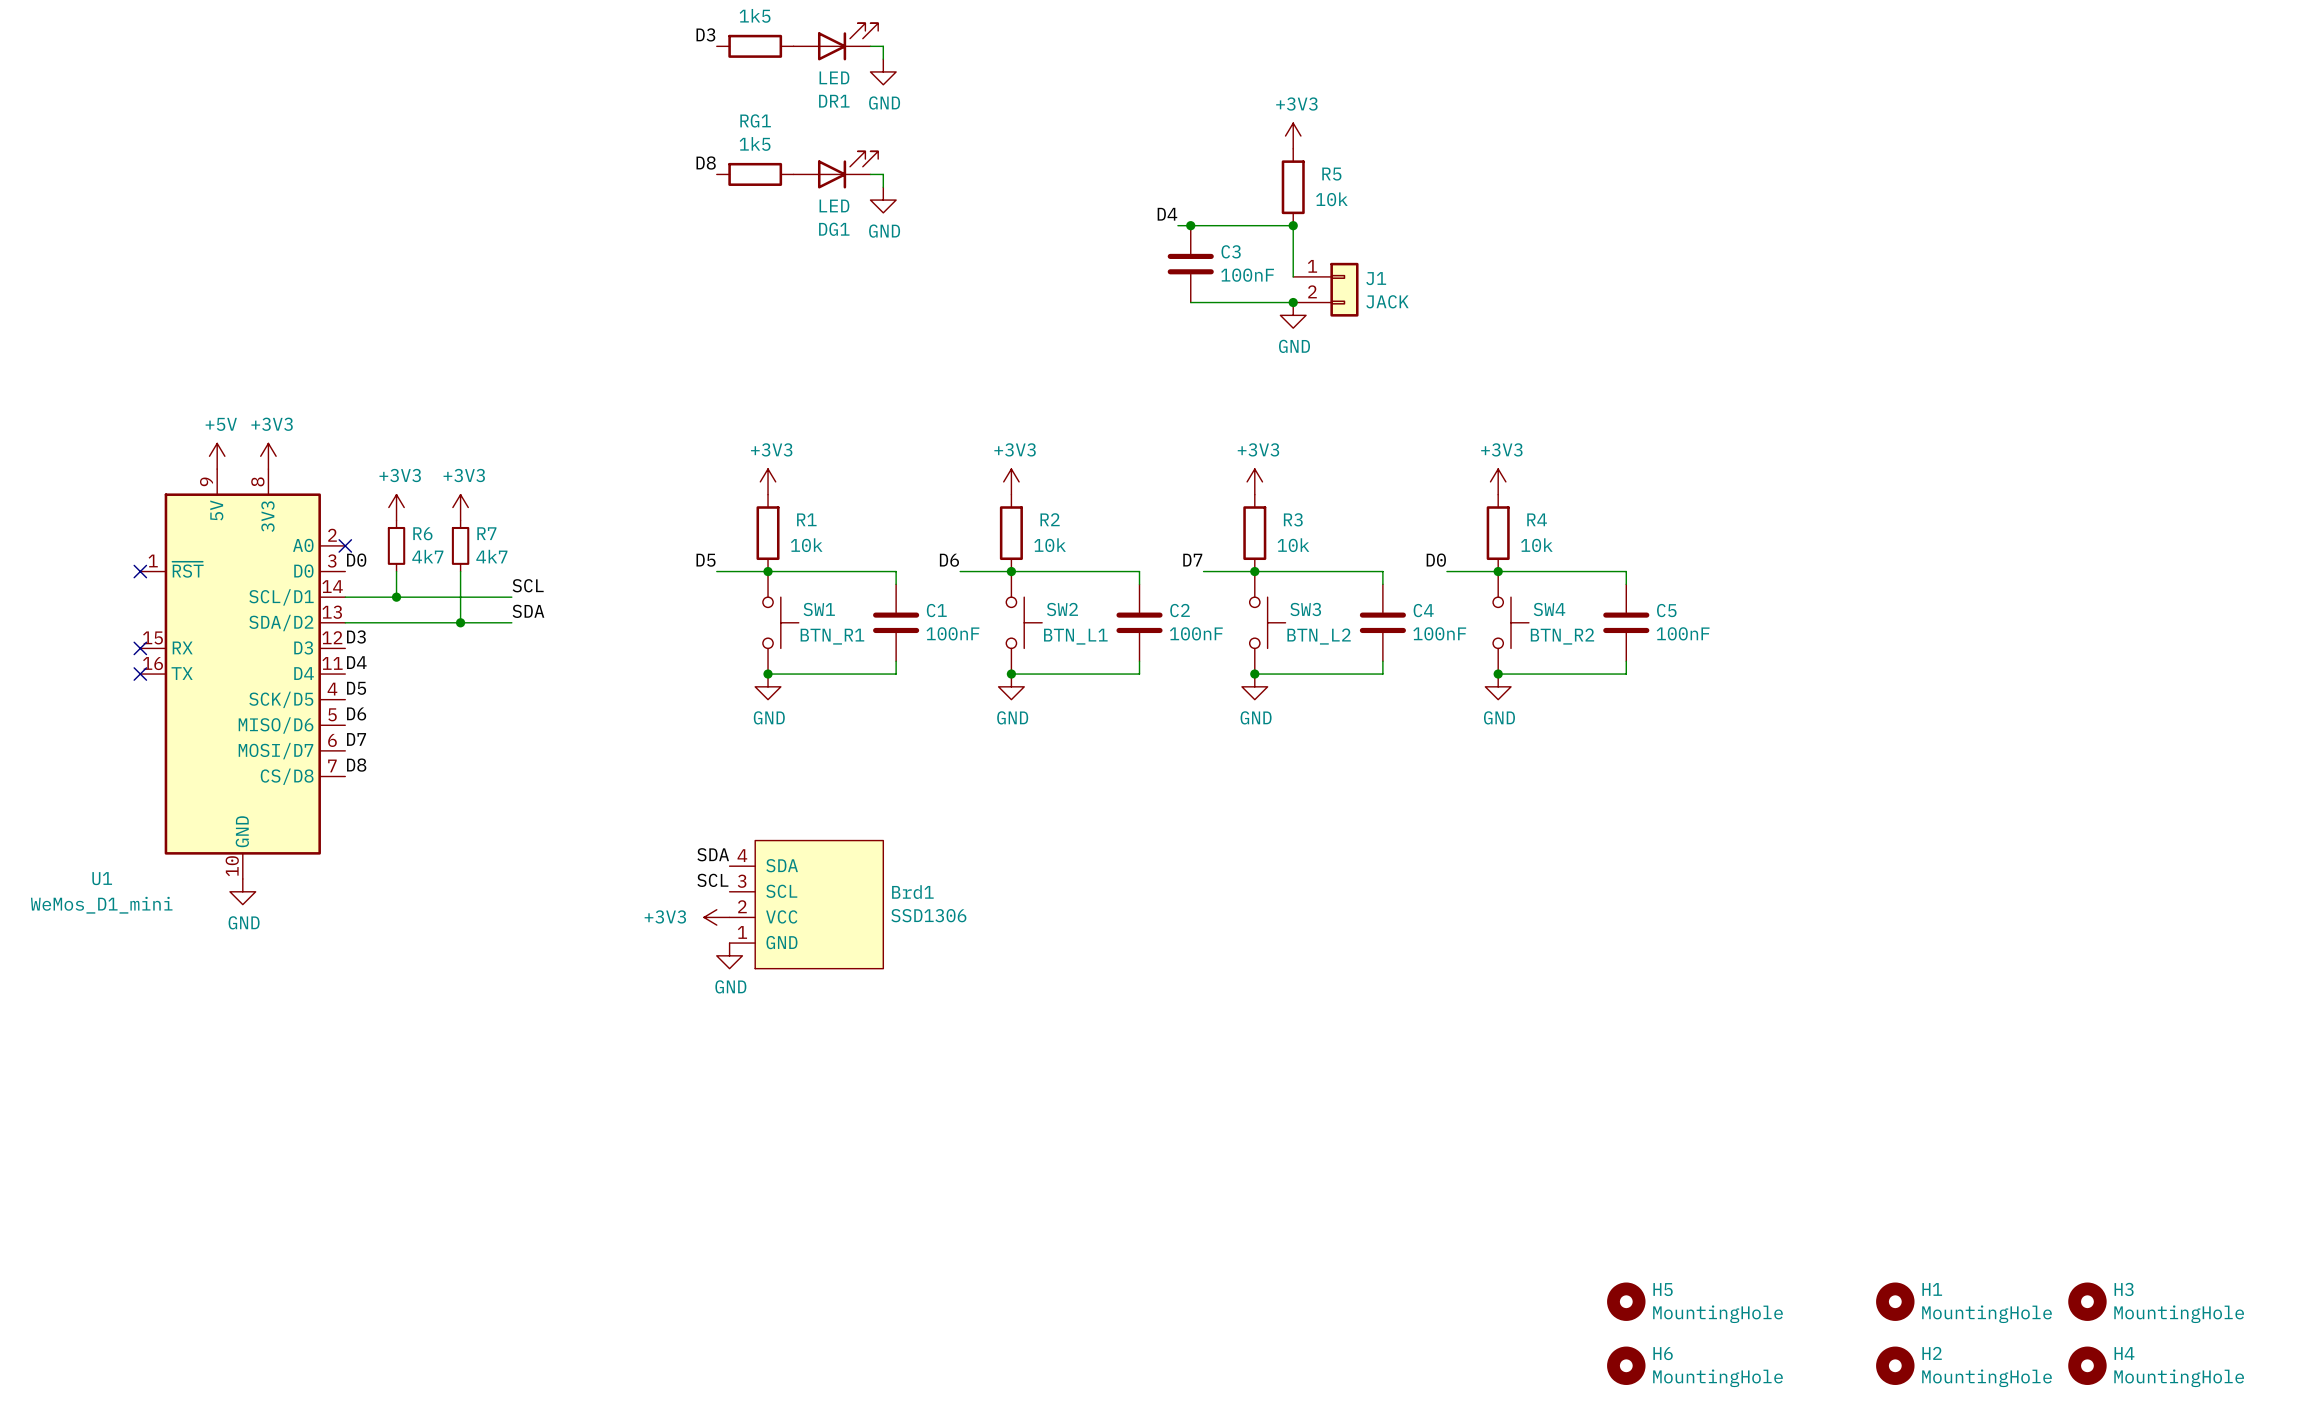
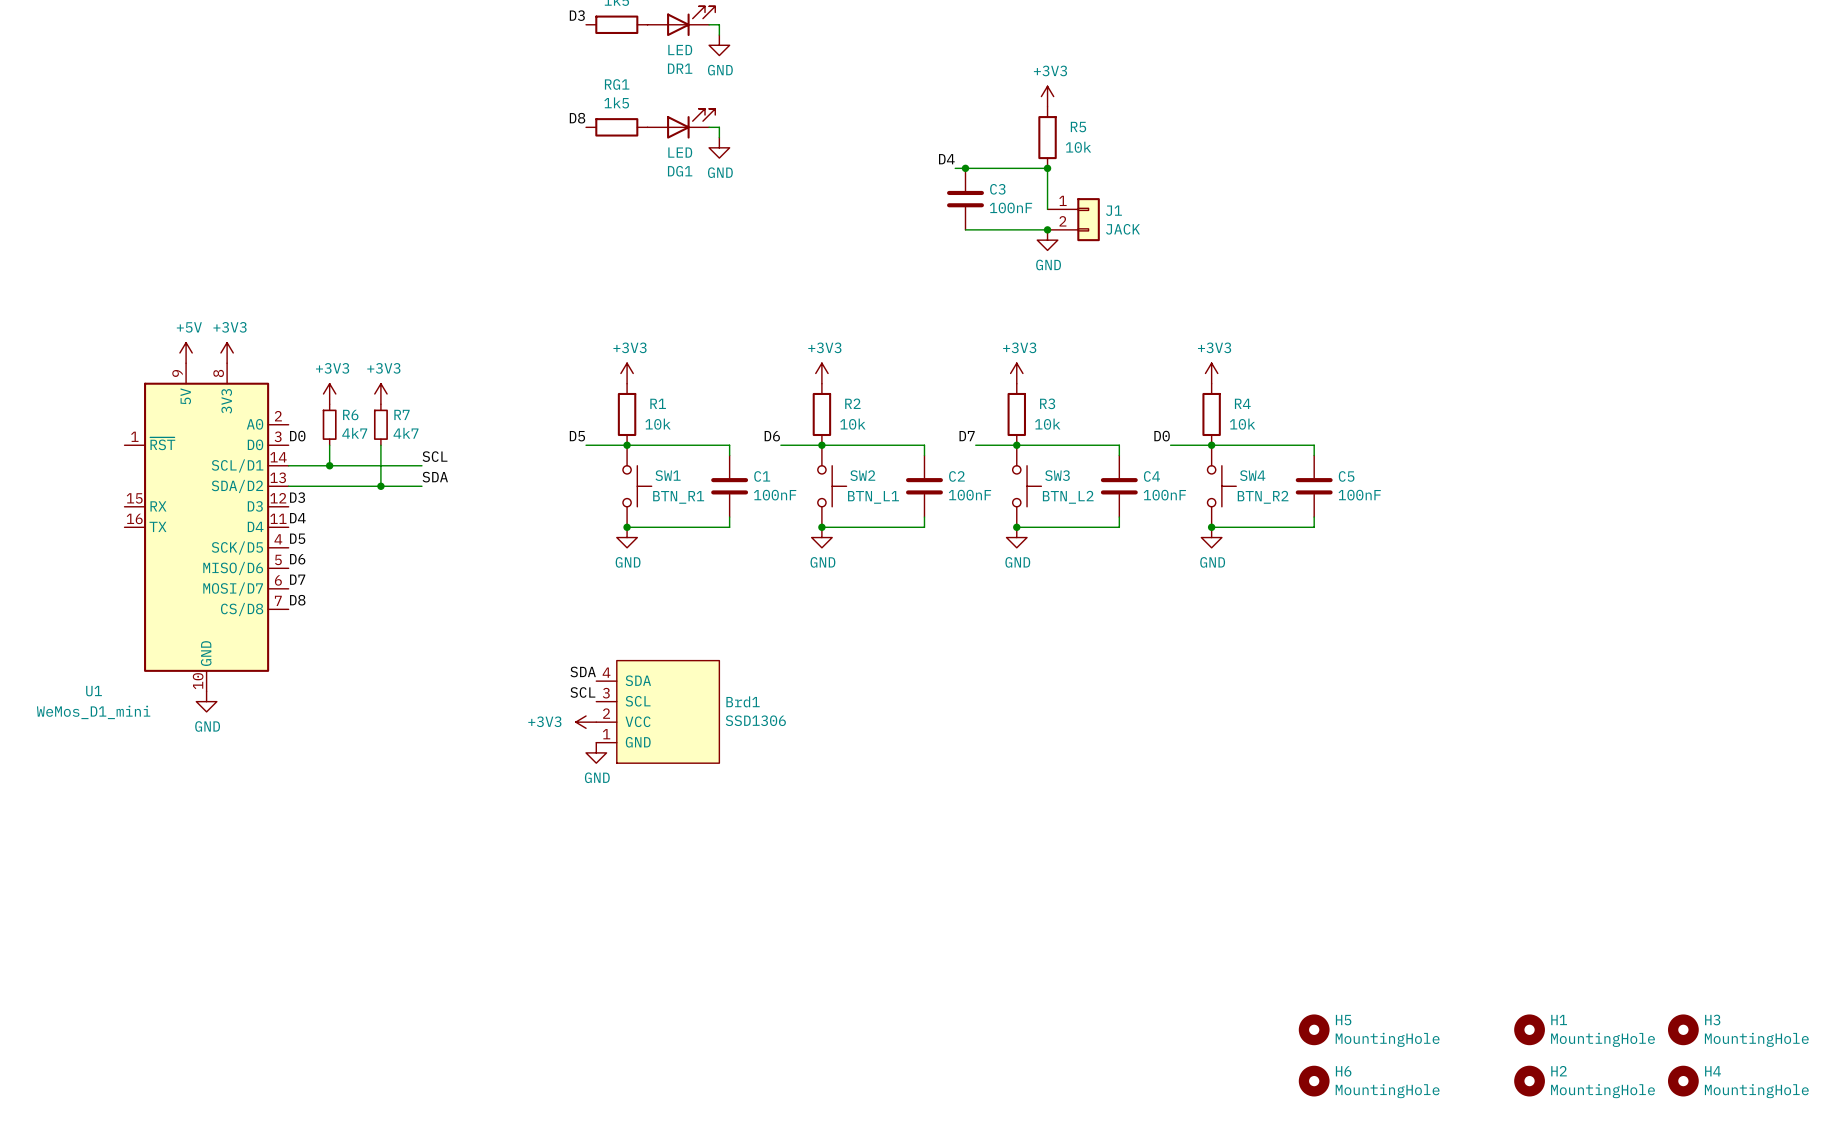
no-connect mark: (345, 545) -> none
no-connect mark: (140, 571) -> none
no-connect mark: (140, 648) -> none
no-connect mark: (140, 674) -> none

